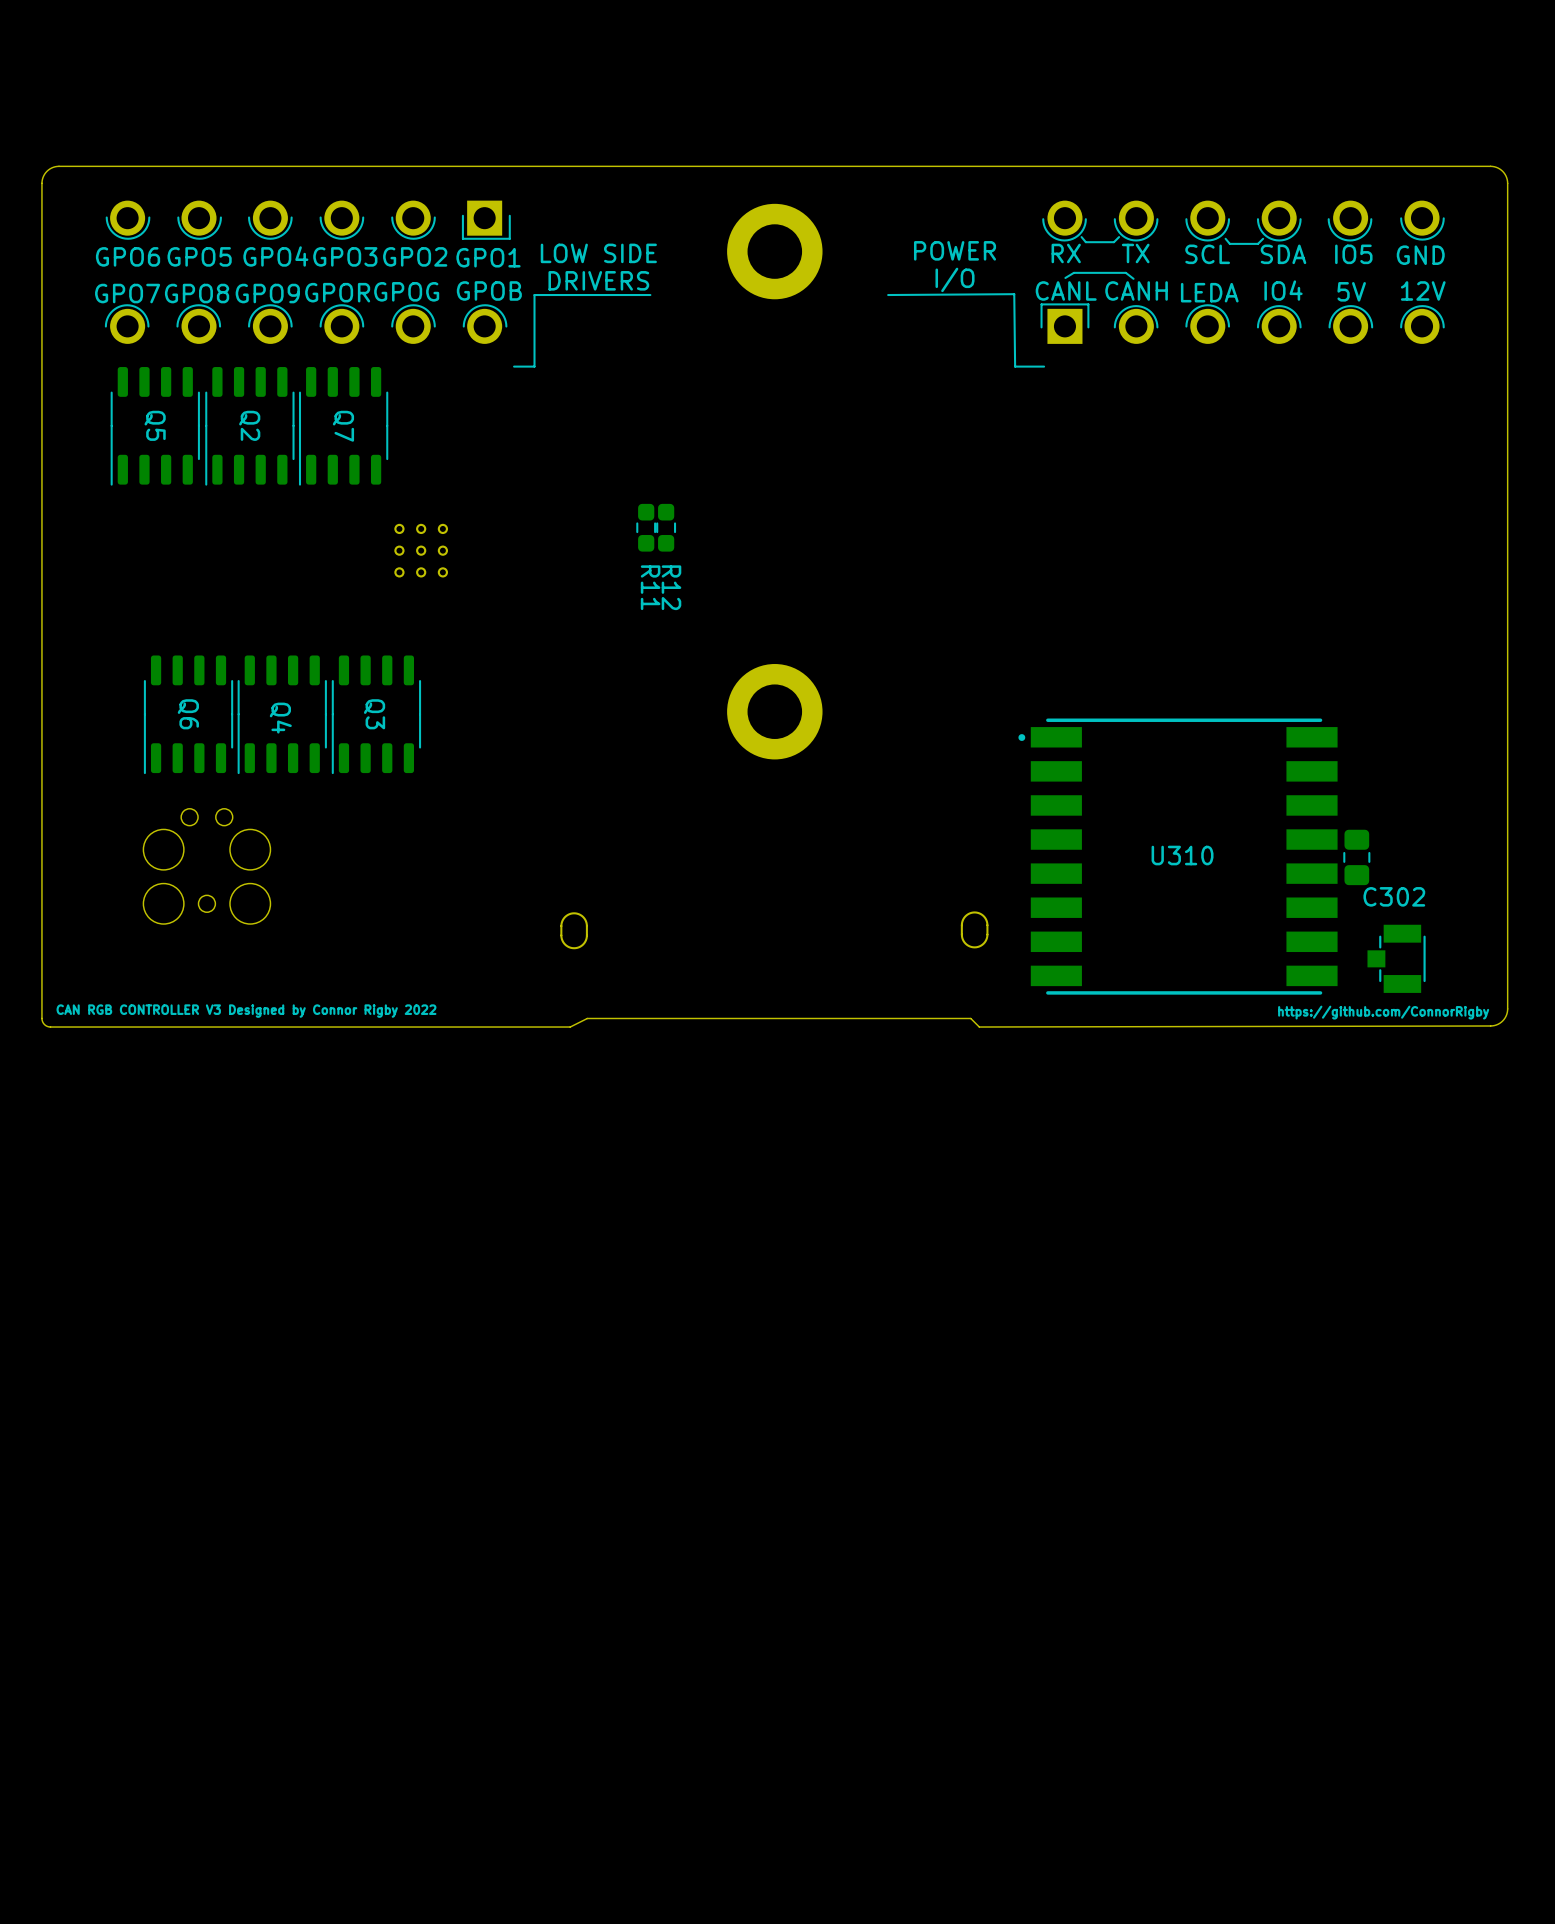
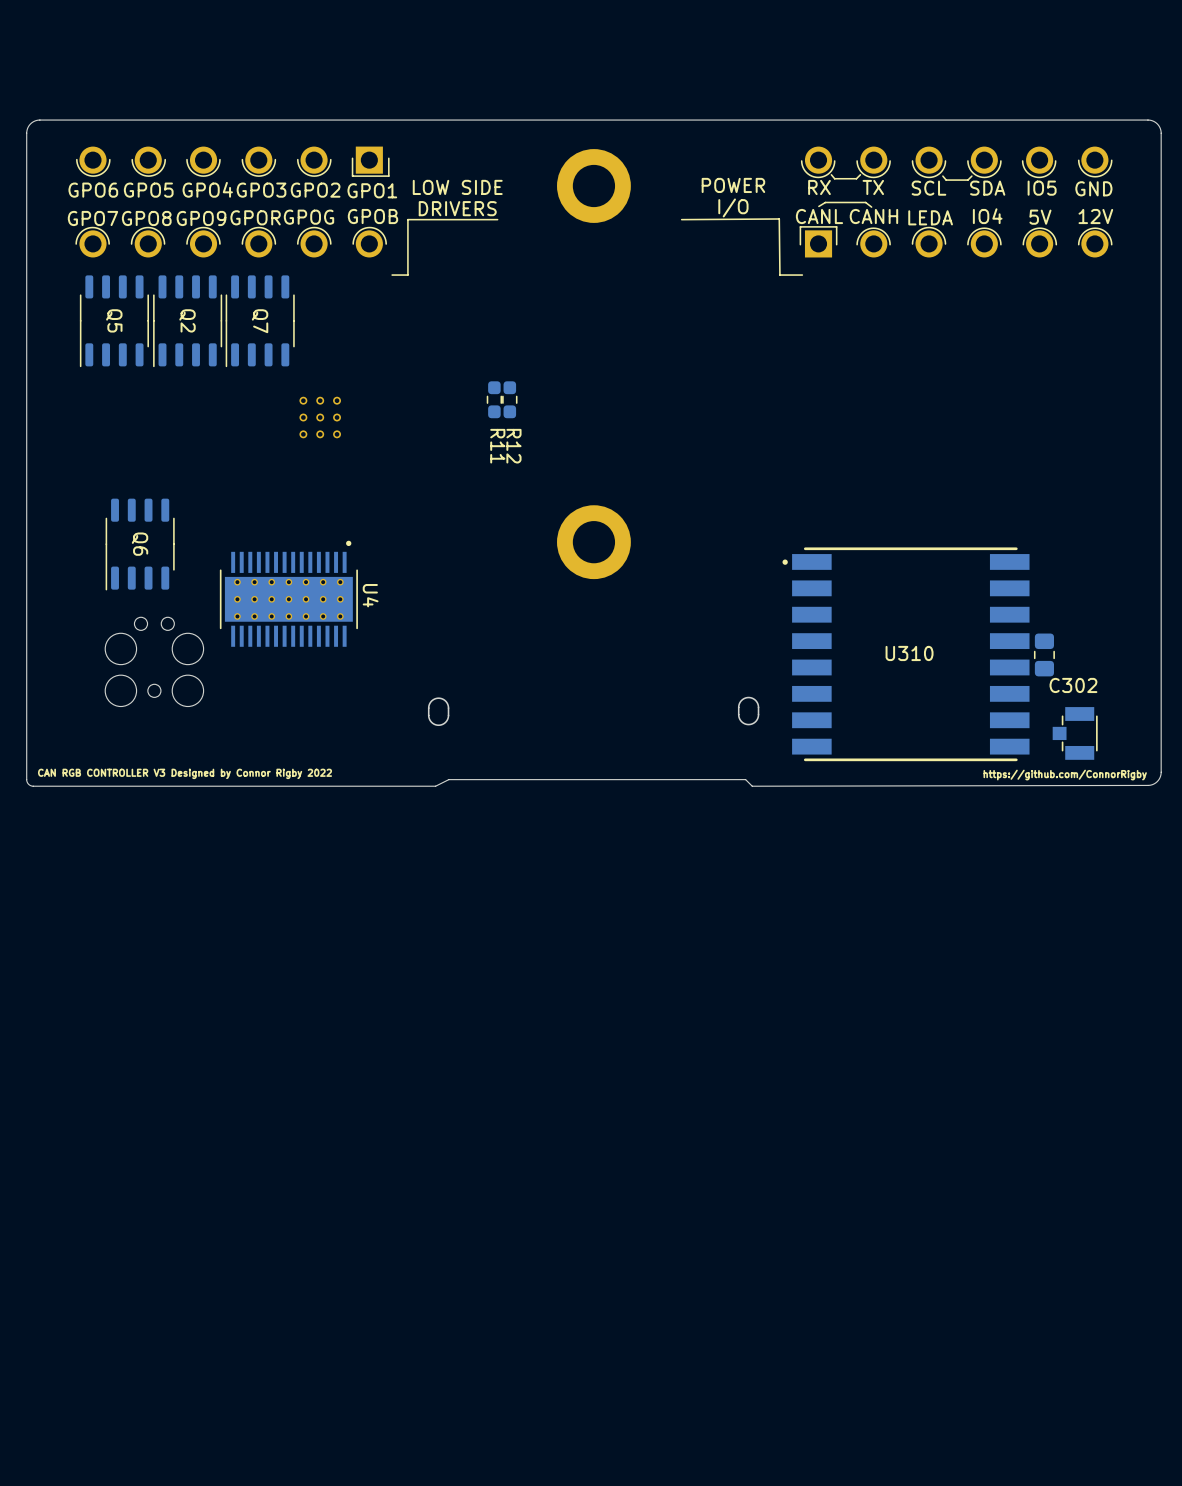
Q4: (282, 714) -> none
Q3: (376, 714) -> none
U4: none -> (288, 593)

